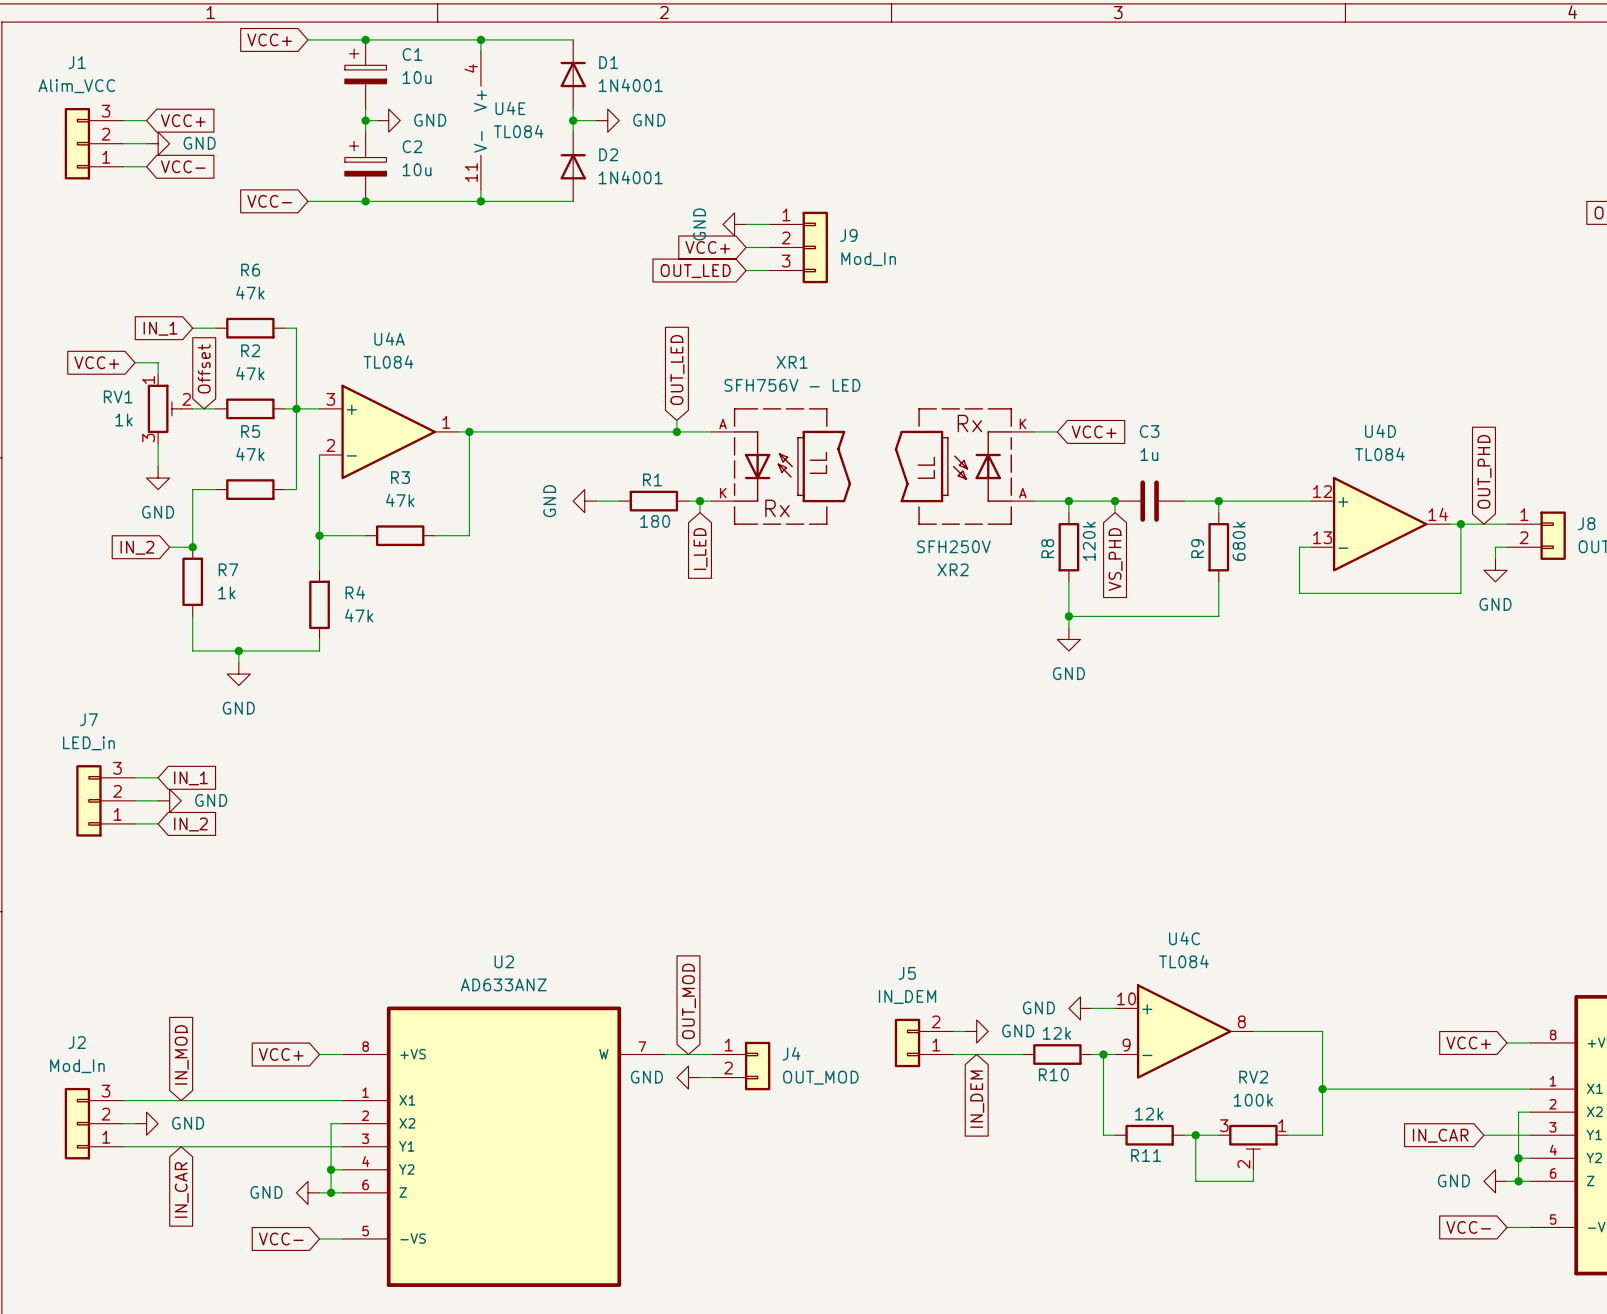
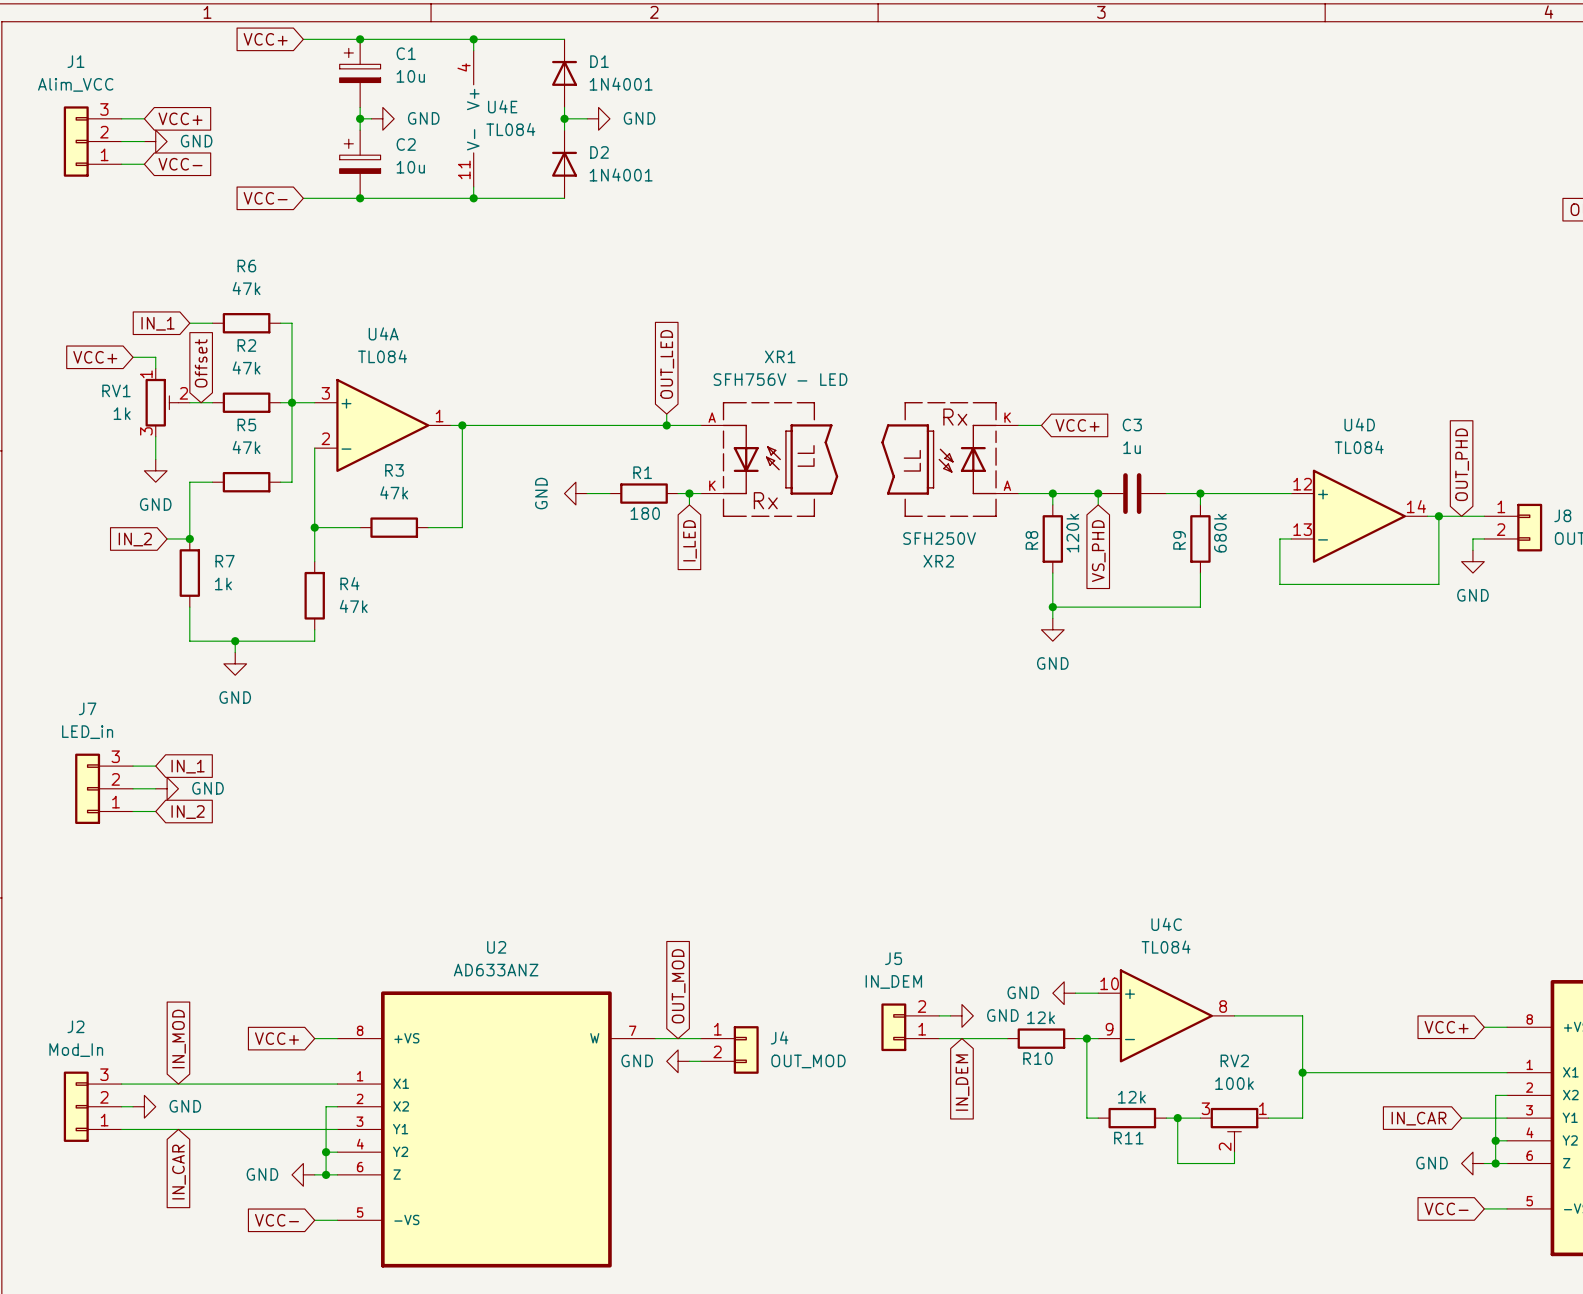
power symbol: GND (734, 224) -> none
wire: (746, 224) (769, 224) -> none
global label: VCC+ (707, 247) -> none
wire: (746, 247) (769, 247) -> none
J9: Mod_In (798, 247) -> none
wire: (746, 270) (769, 270) -> none
global label: OUT_LED (695, 271) -> none

